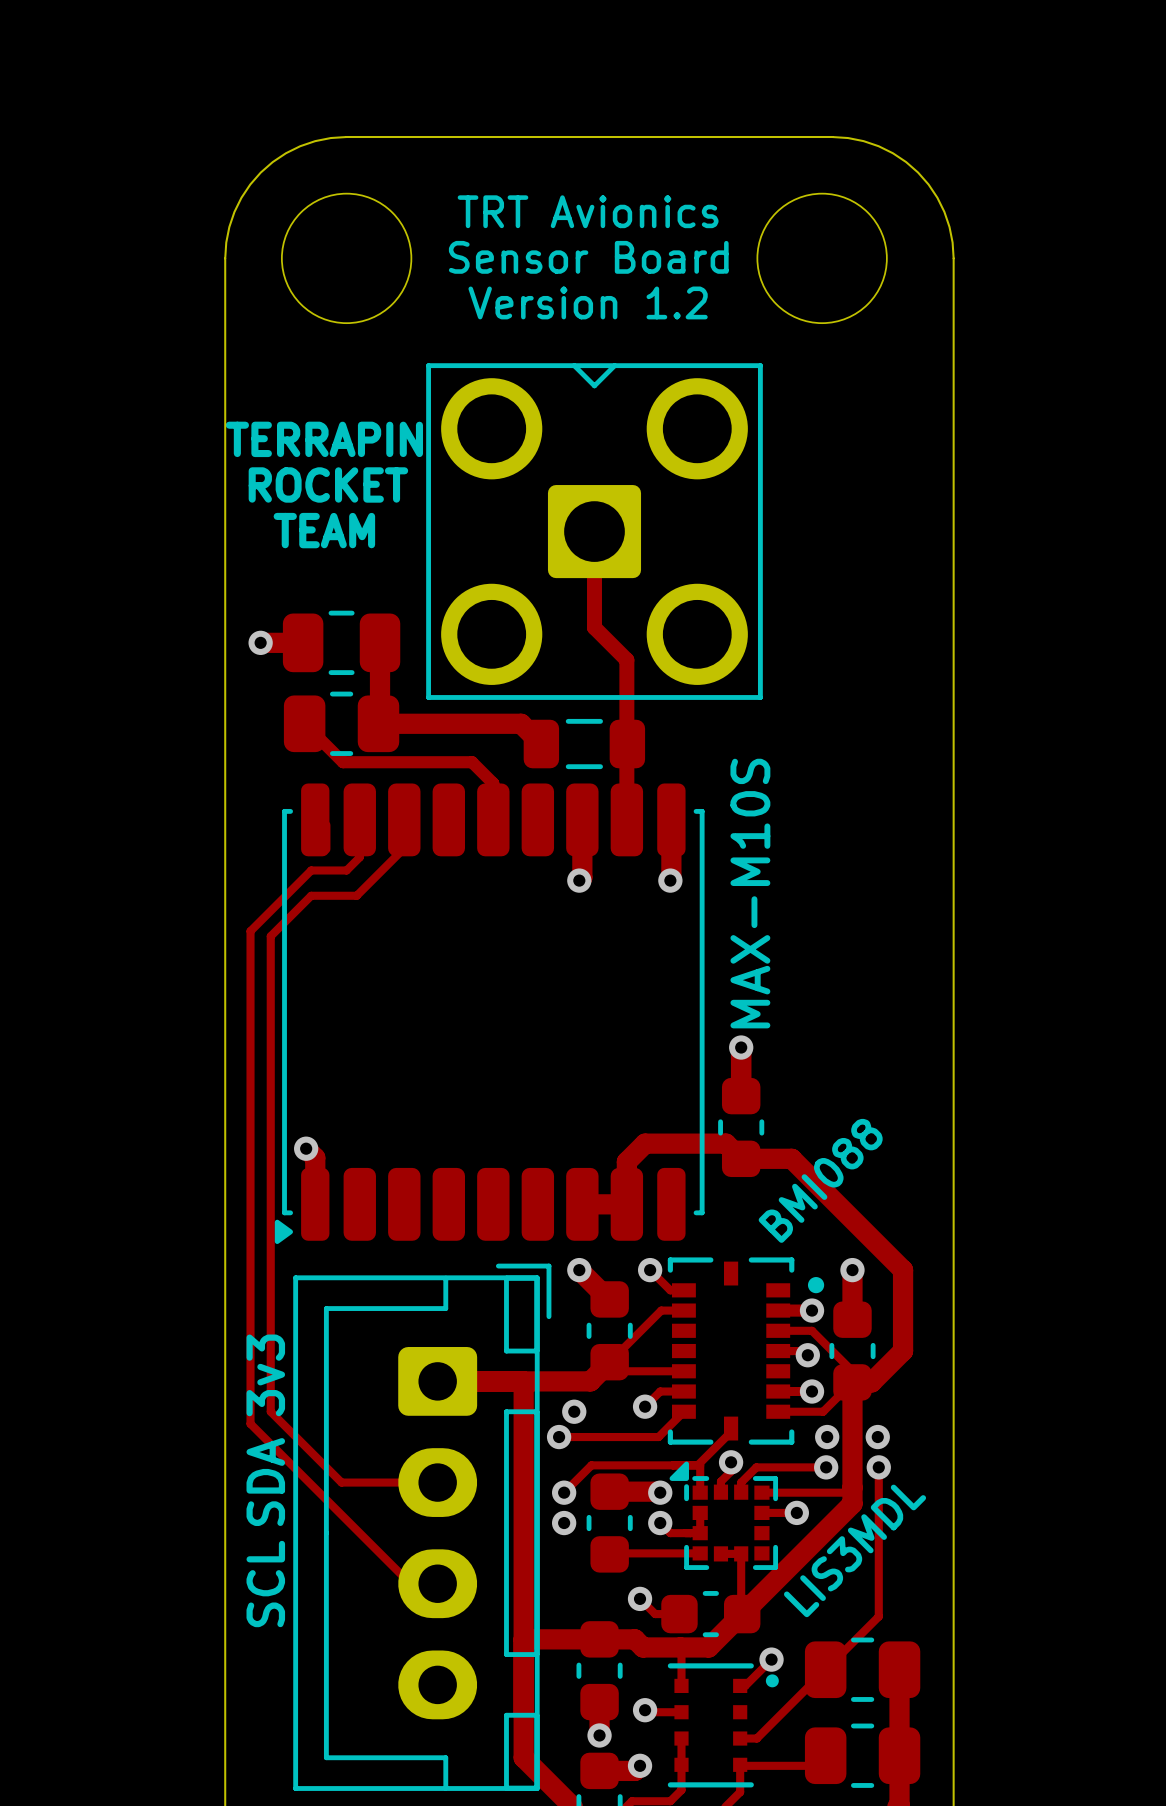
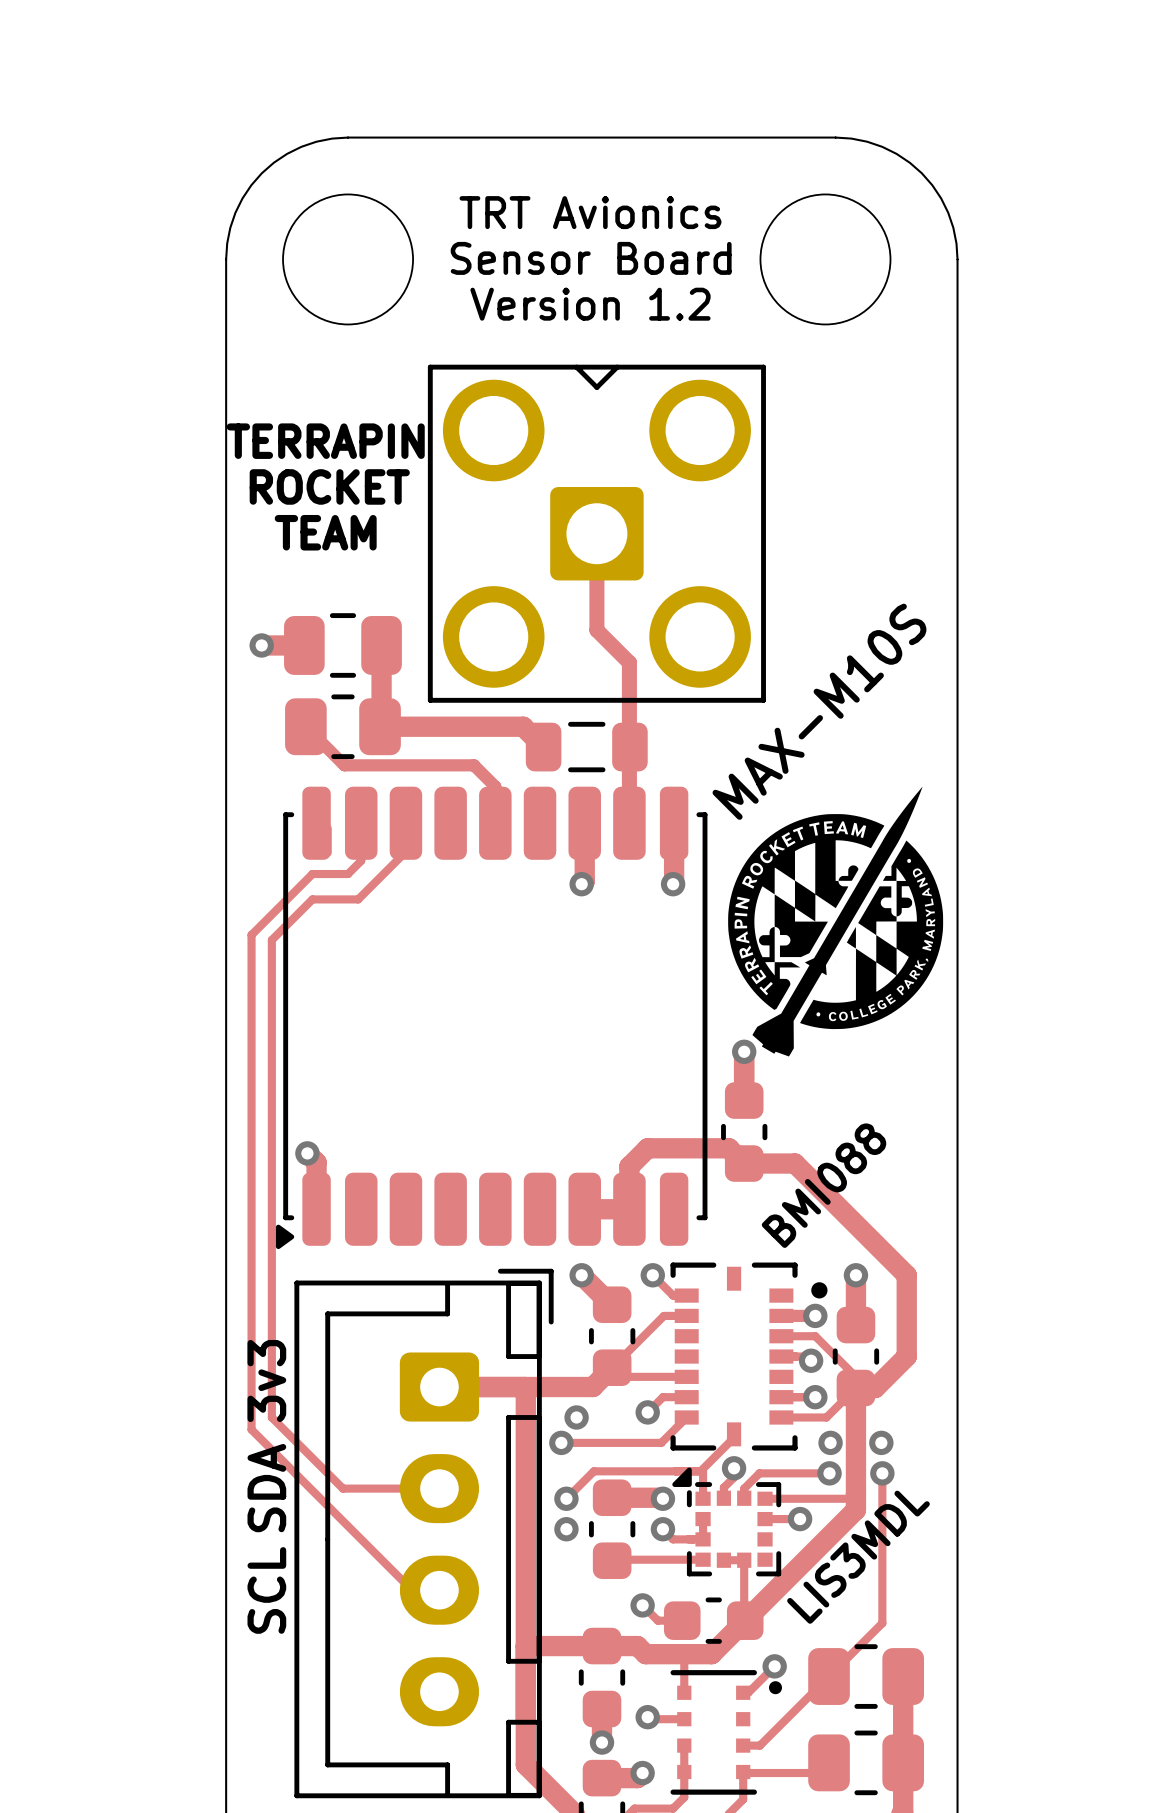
drawing: none -> [728, 786, 944, 1057]
text rotation: 0° (750, 893) -> 45° clockwise (819, 711)

